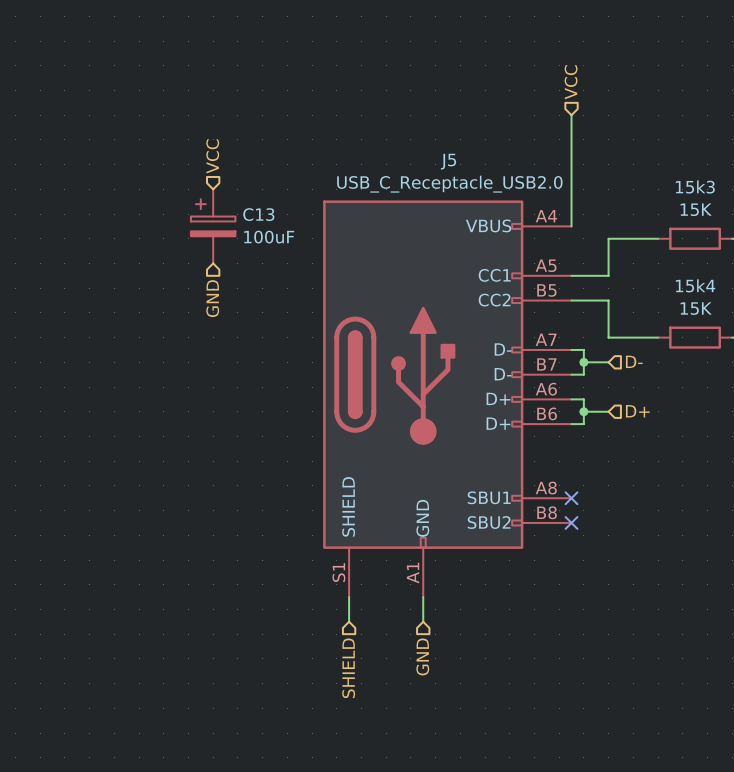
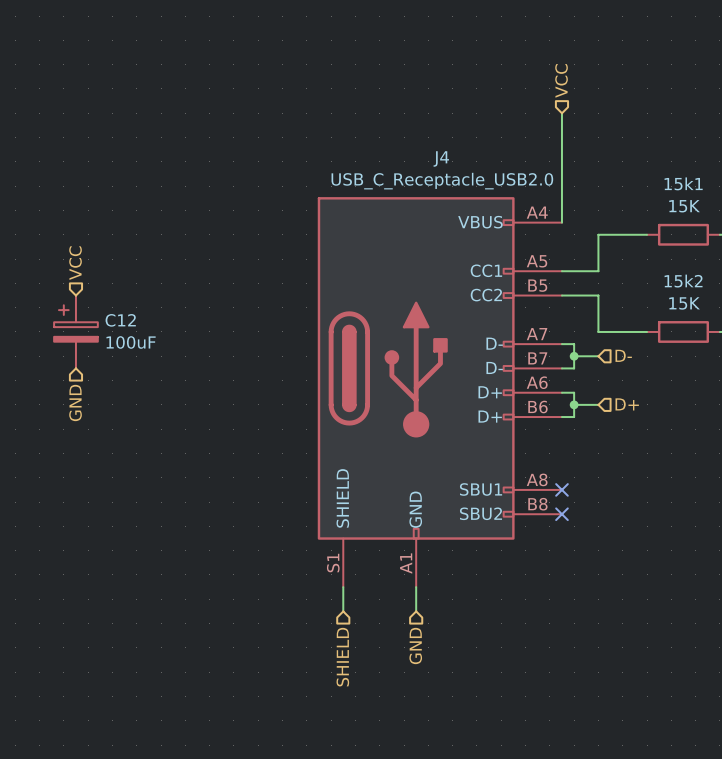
hierarchical label position: VCC (212, 156) -> VCC (75, 263)
J5 name: J5 (448, 161) -> J4 (441, 158)
15k3 name: 15k3 (695, 187) -> 15k1 (683, 183)
C13: 100uF (213, 226) -> none
15k4 name: 15k4 (695, 285) -> 15k2 (683, 281)
hierarchical label position: GND (212, 298) -> GND (75, 402)
C12: none -> 100uF (75, 331)

